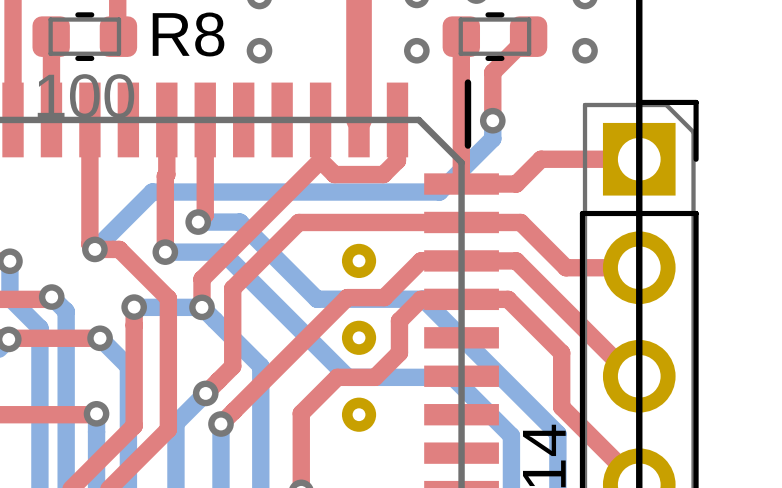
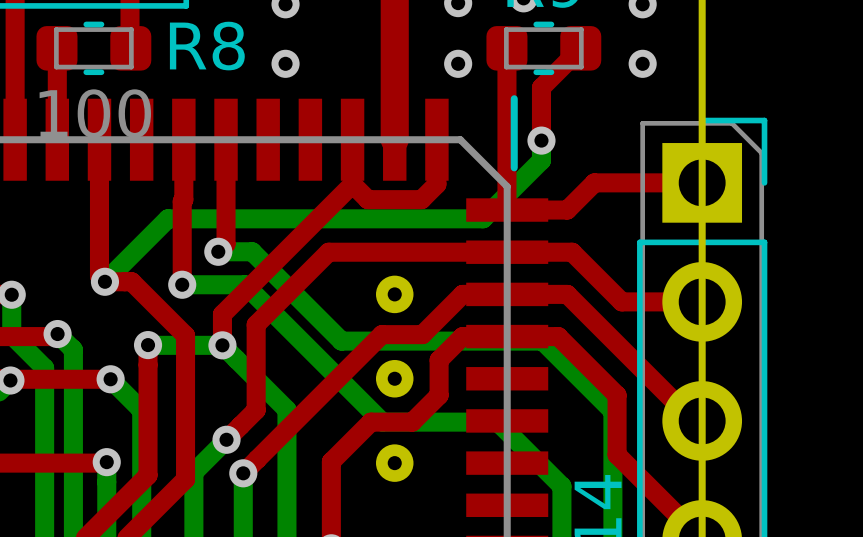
bottom track: (229, 222) (239, 222) (317, 299) (423, 299) (557, 433) -> (252, 251) (341, 341) (542, 341) (612, 411) (612, 484)

